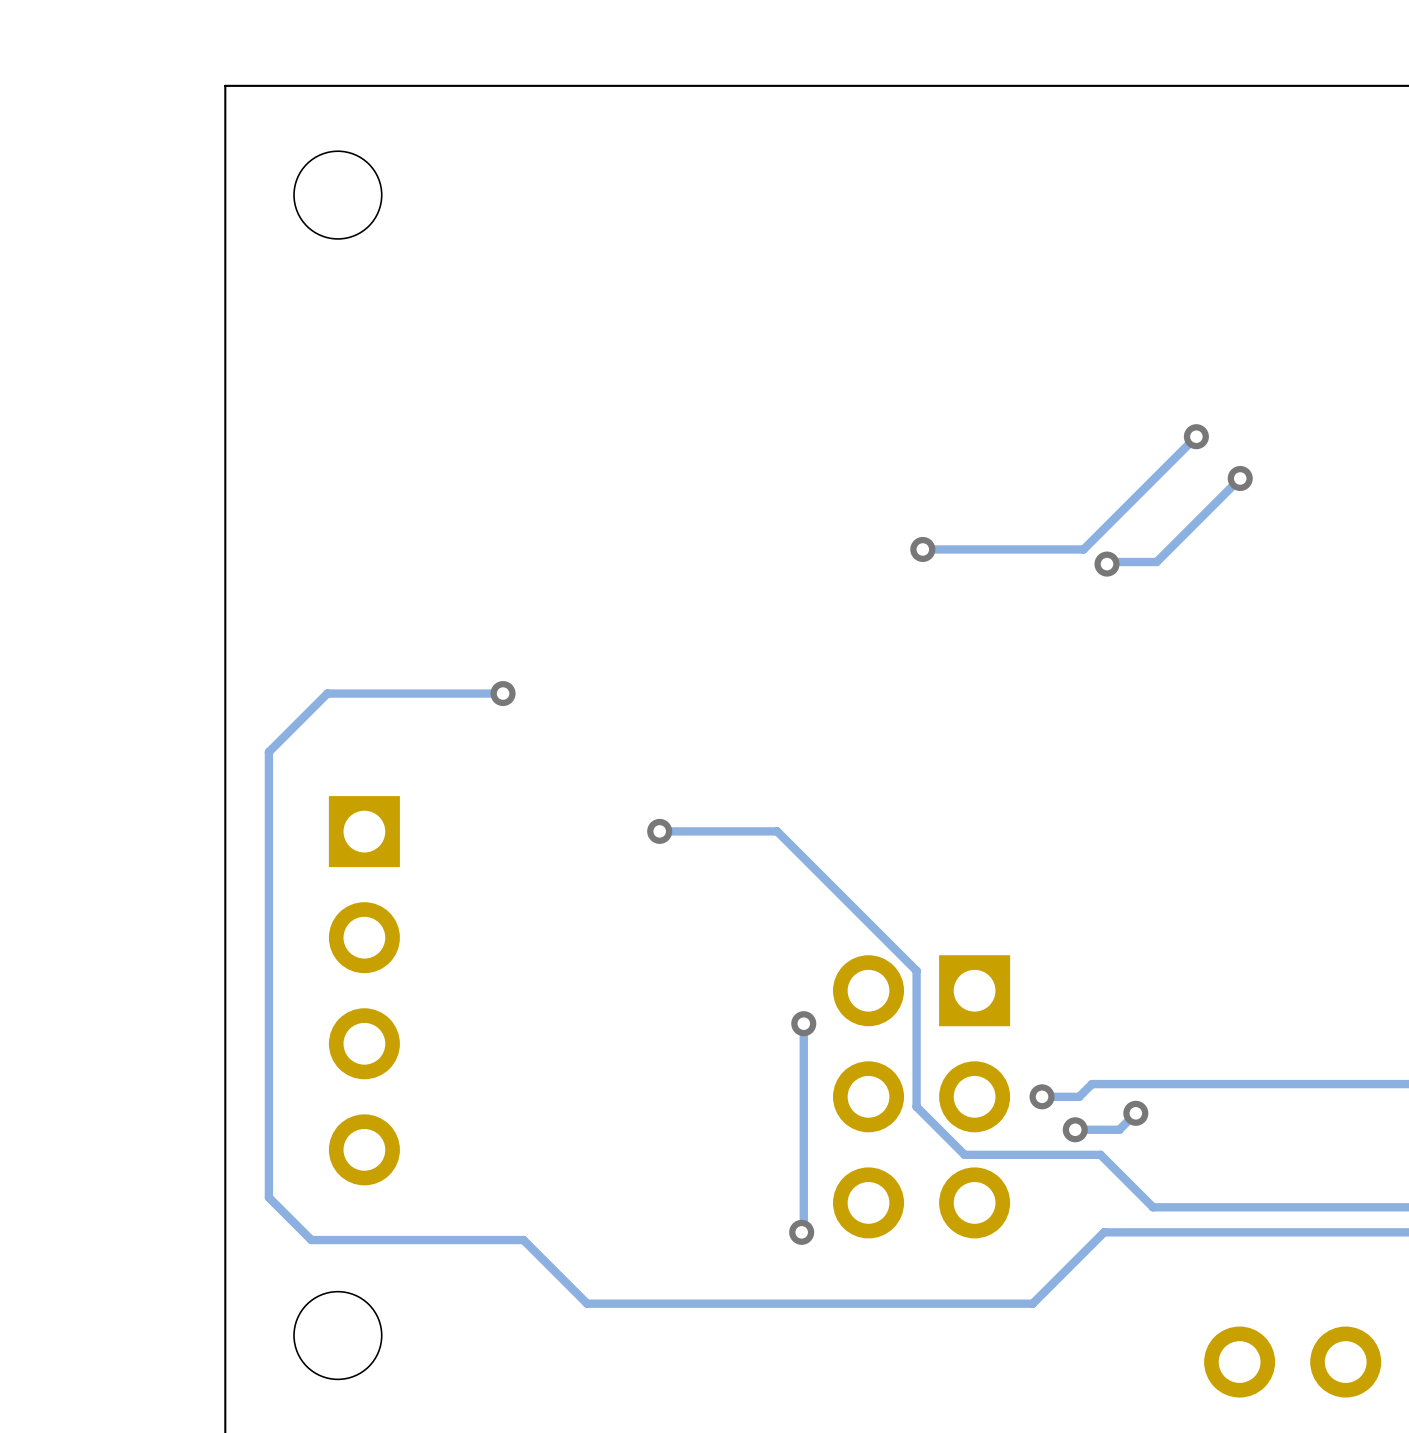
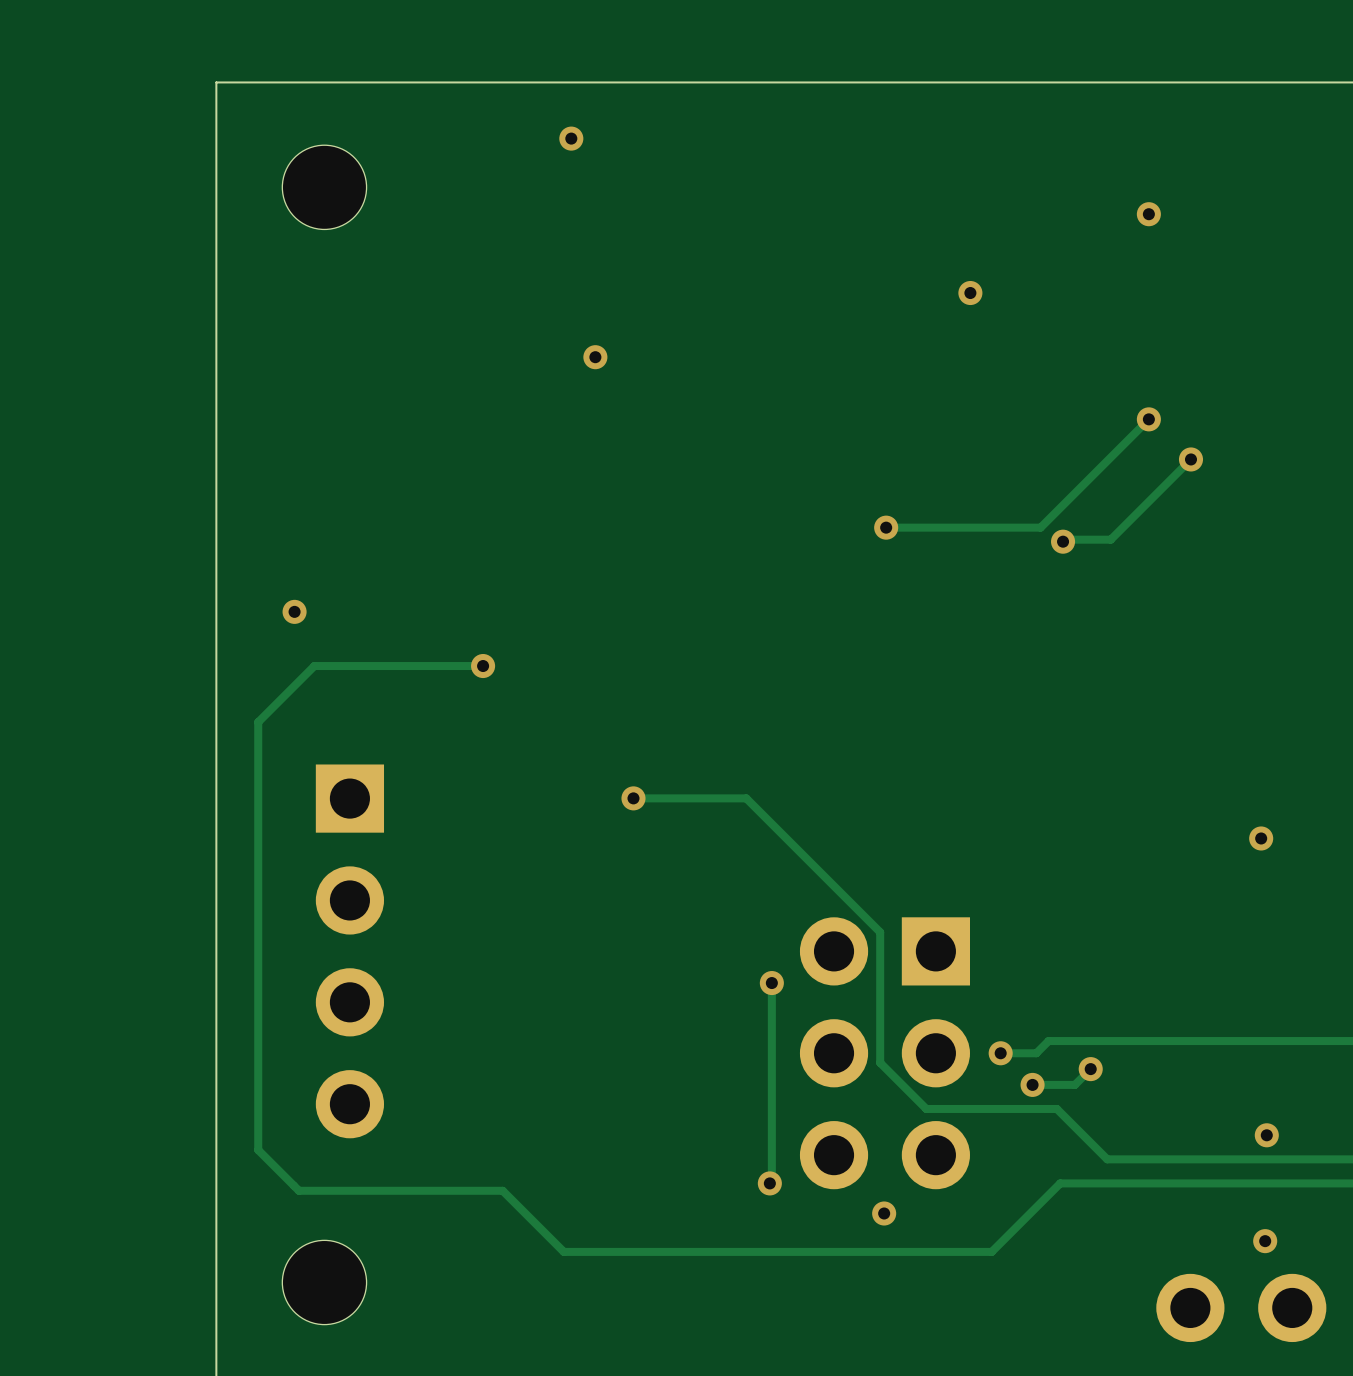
via: none -> (571, 138)
via: none -> (1148, 214)
via: none -> (970, 293)
via: none -> (595, 357)
via: none -> (294, 611)
via: none -> (1261, 838)
via: none -> (1266, 1135)
via: none -> (884, 1213)
via: none -> (1265, 1241)

